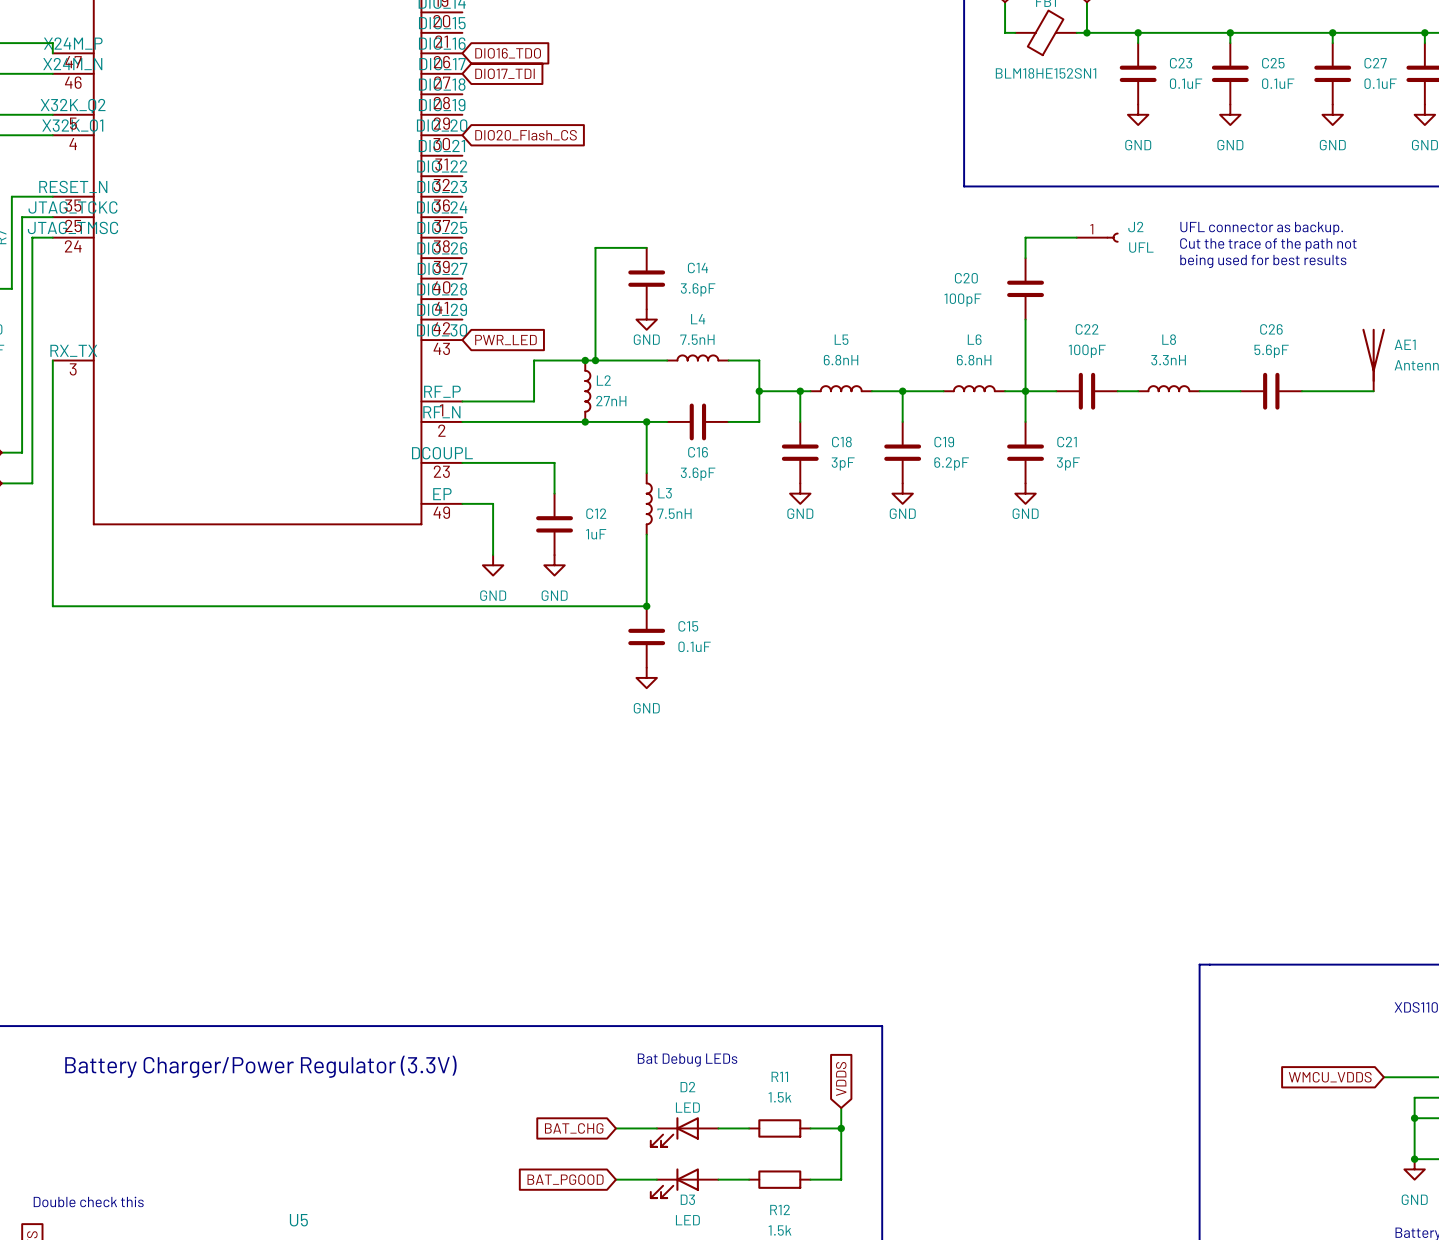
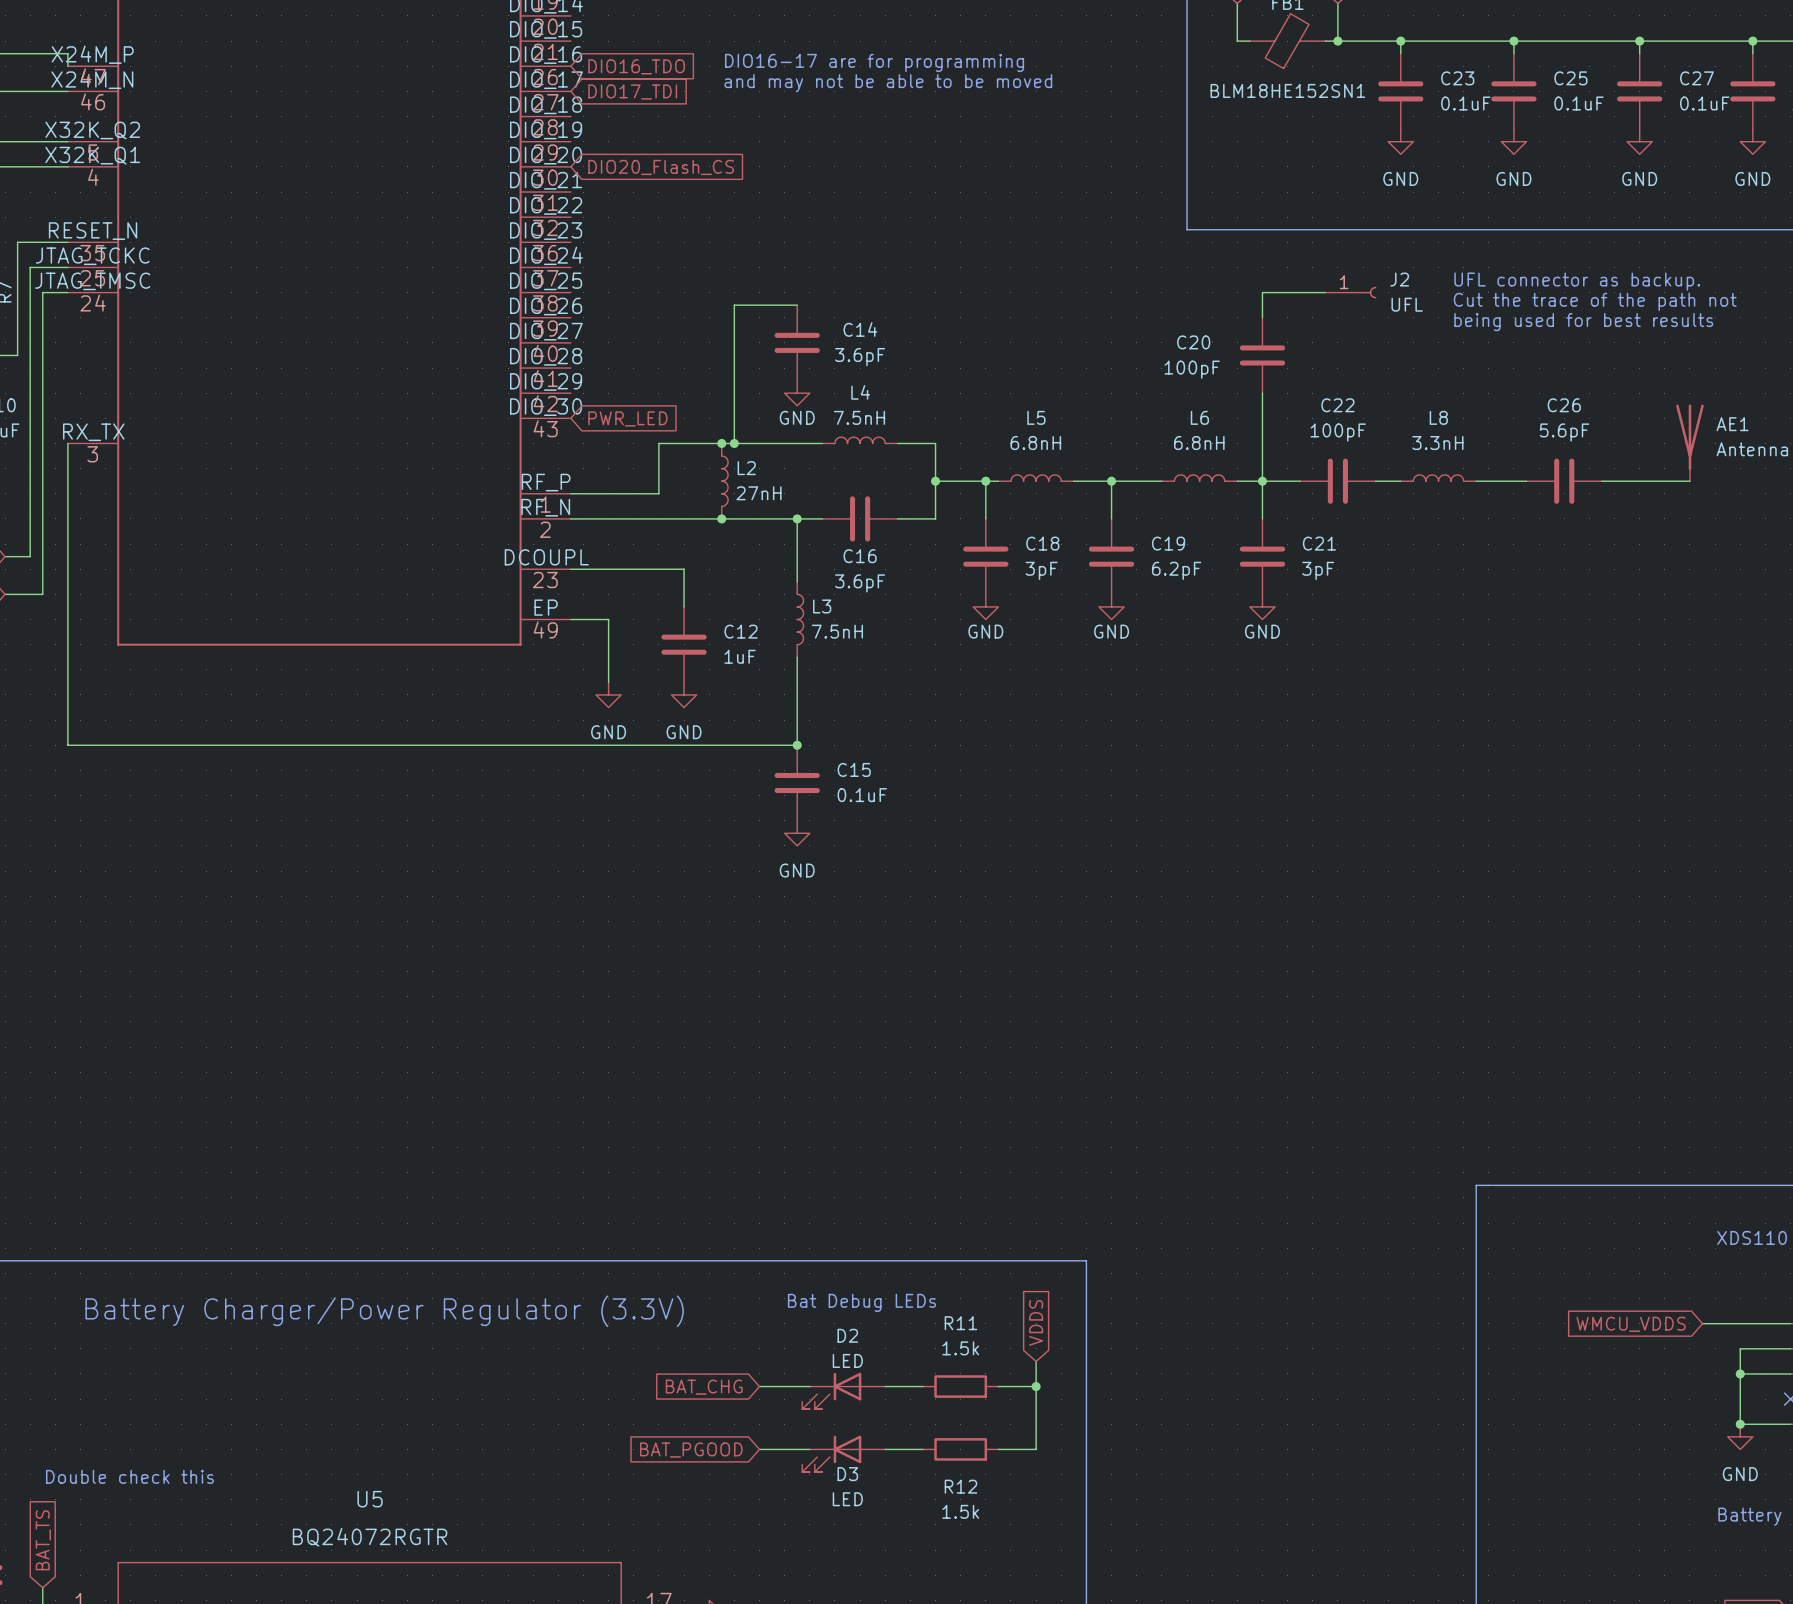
text: none -> DIO16-17 are for programming (874, 62)
text: none -> and may not be able to be moved (888, 83)

